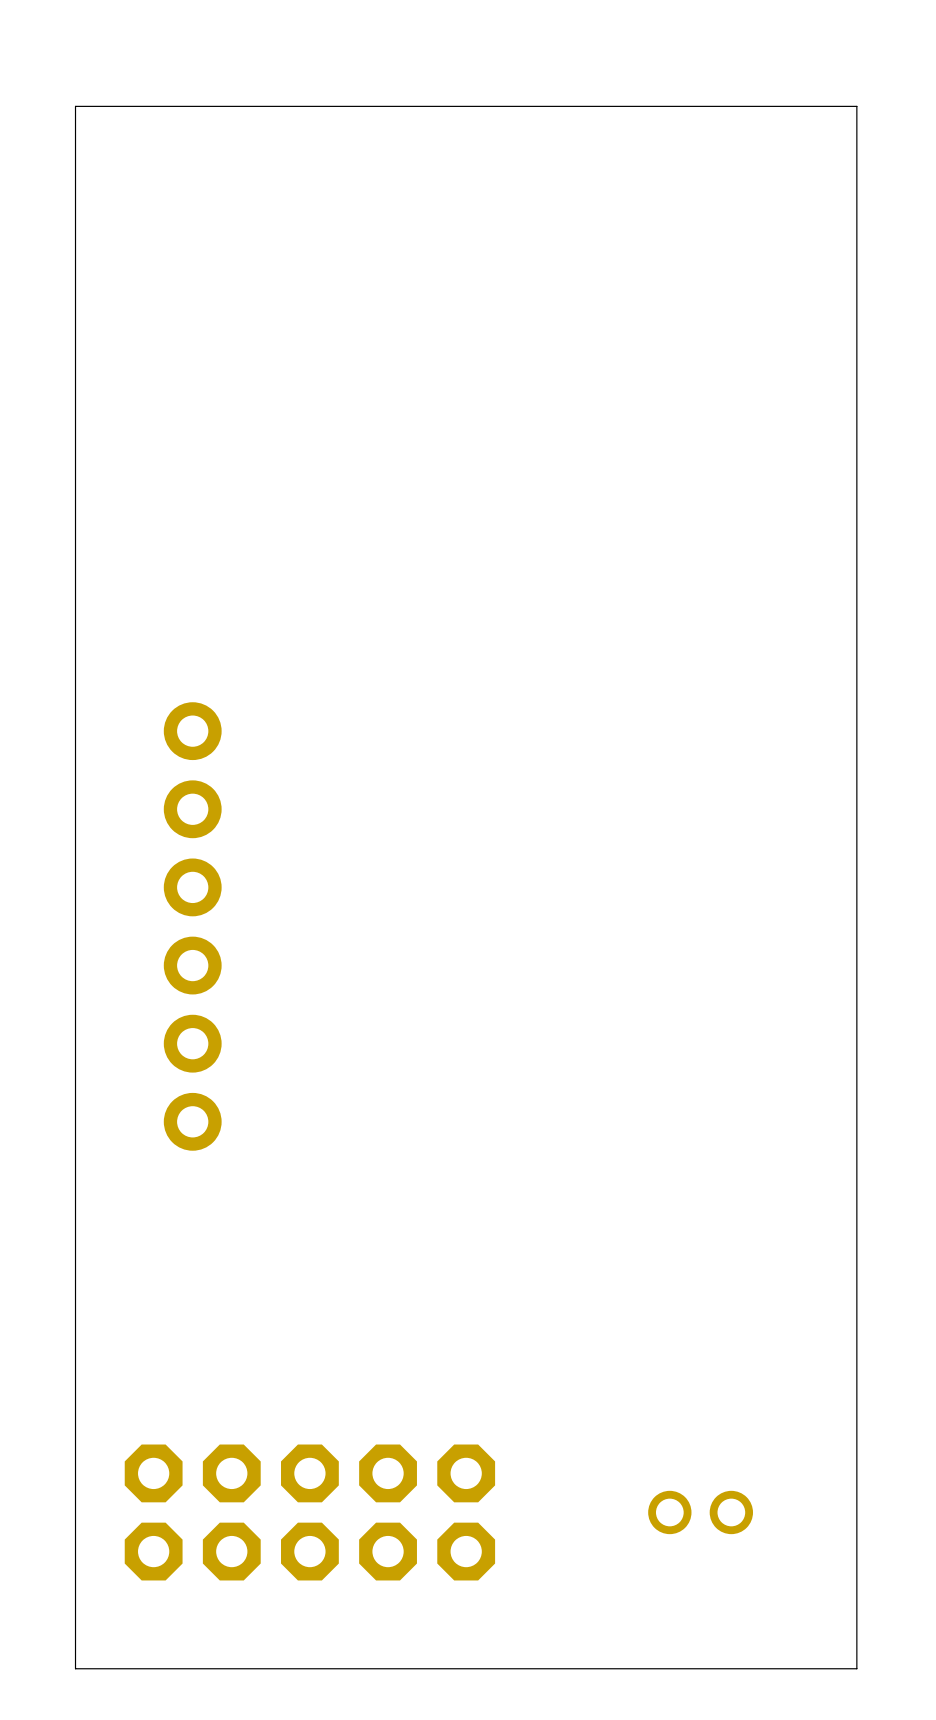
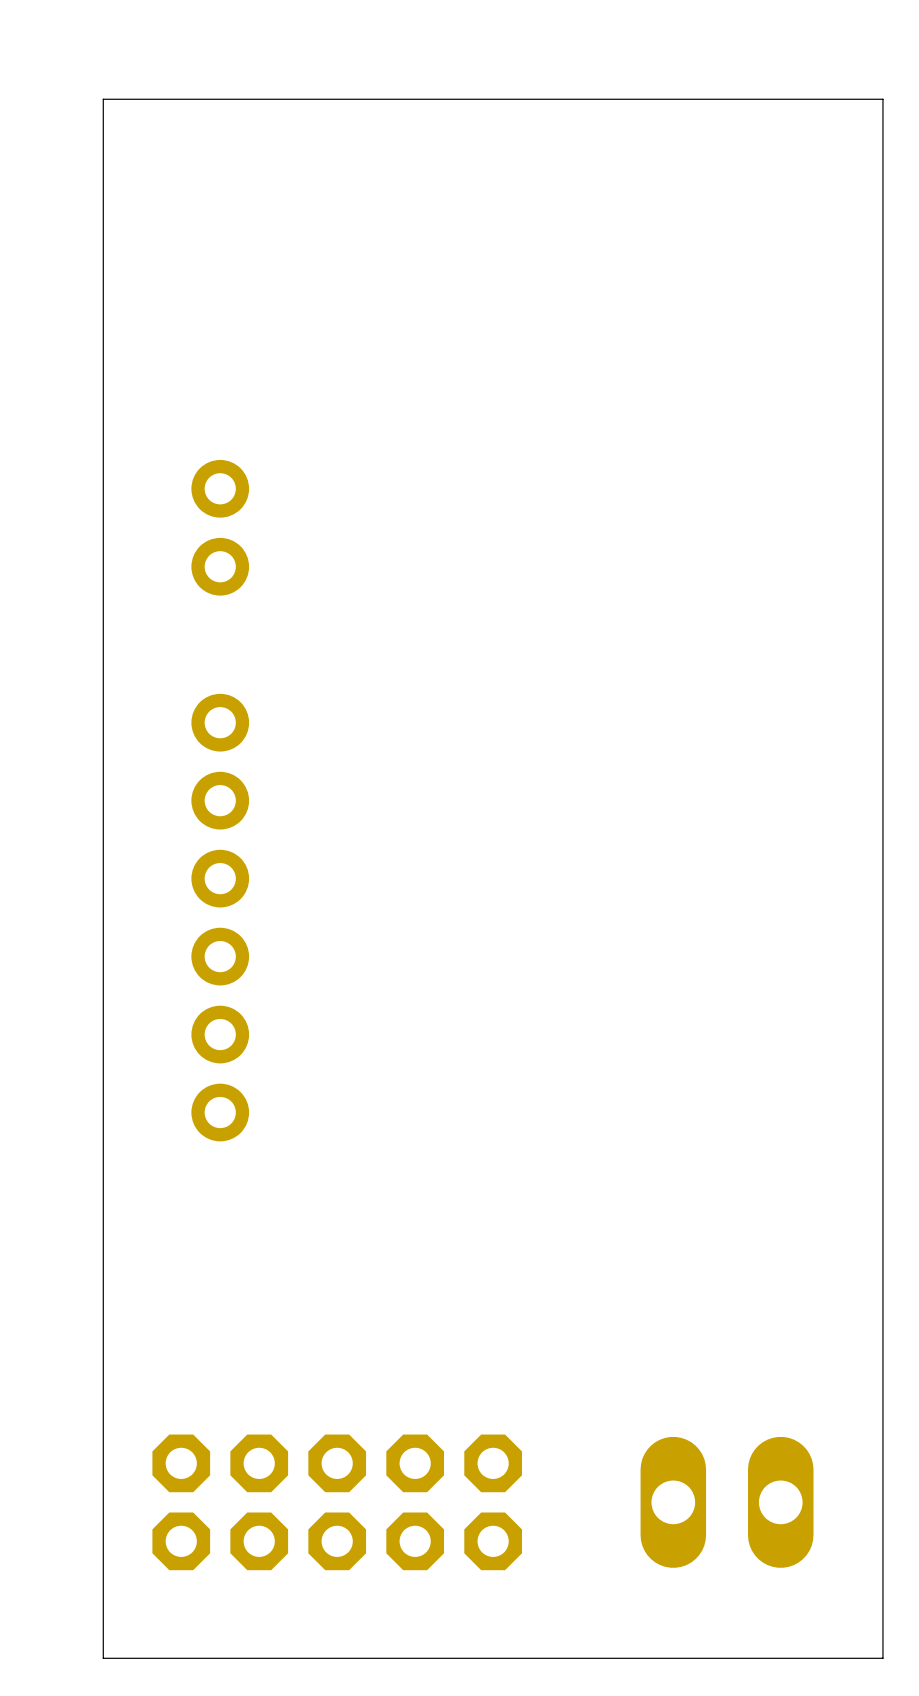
part: none -> (220, 527)
part footprint: [648, 1490, 754, 1535] -> [640, 1436, 814, 1568]

